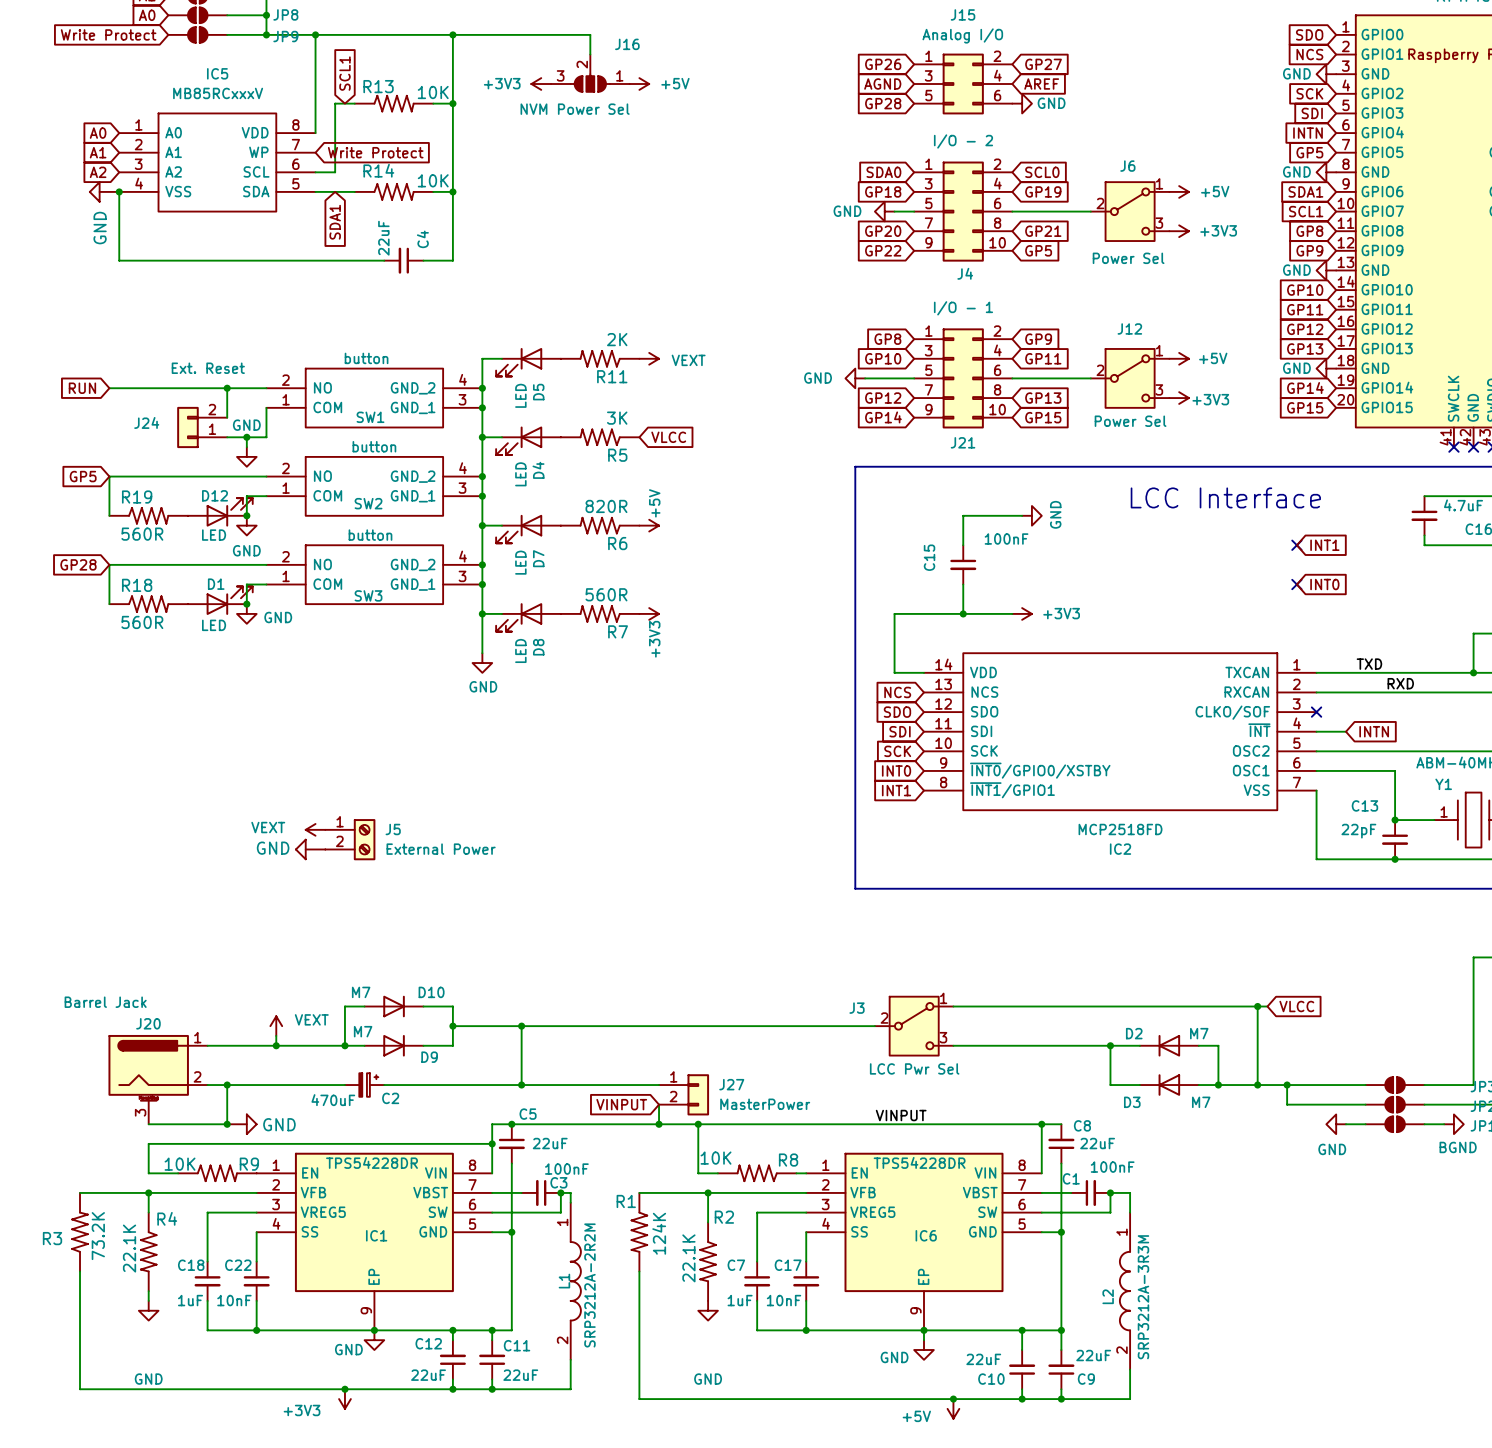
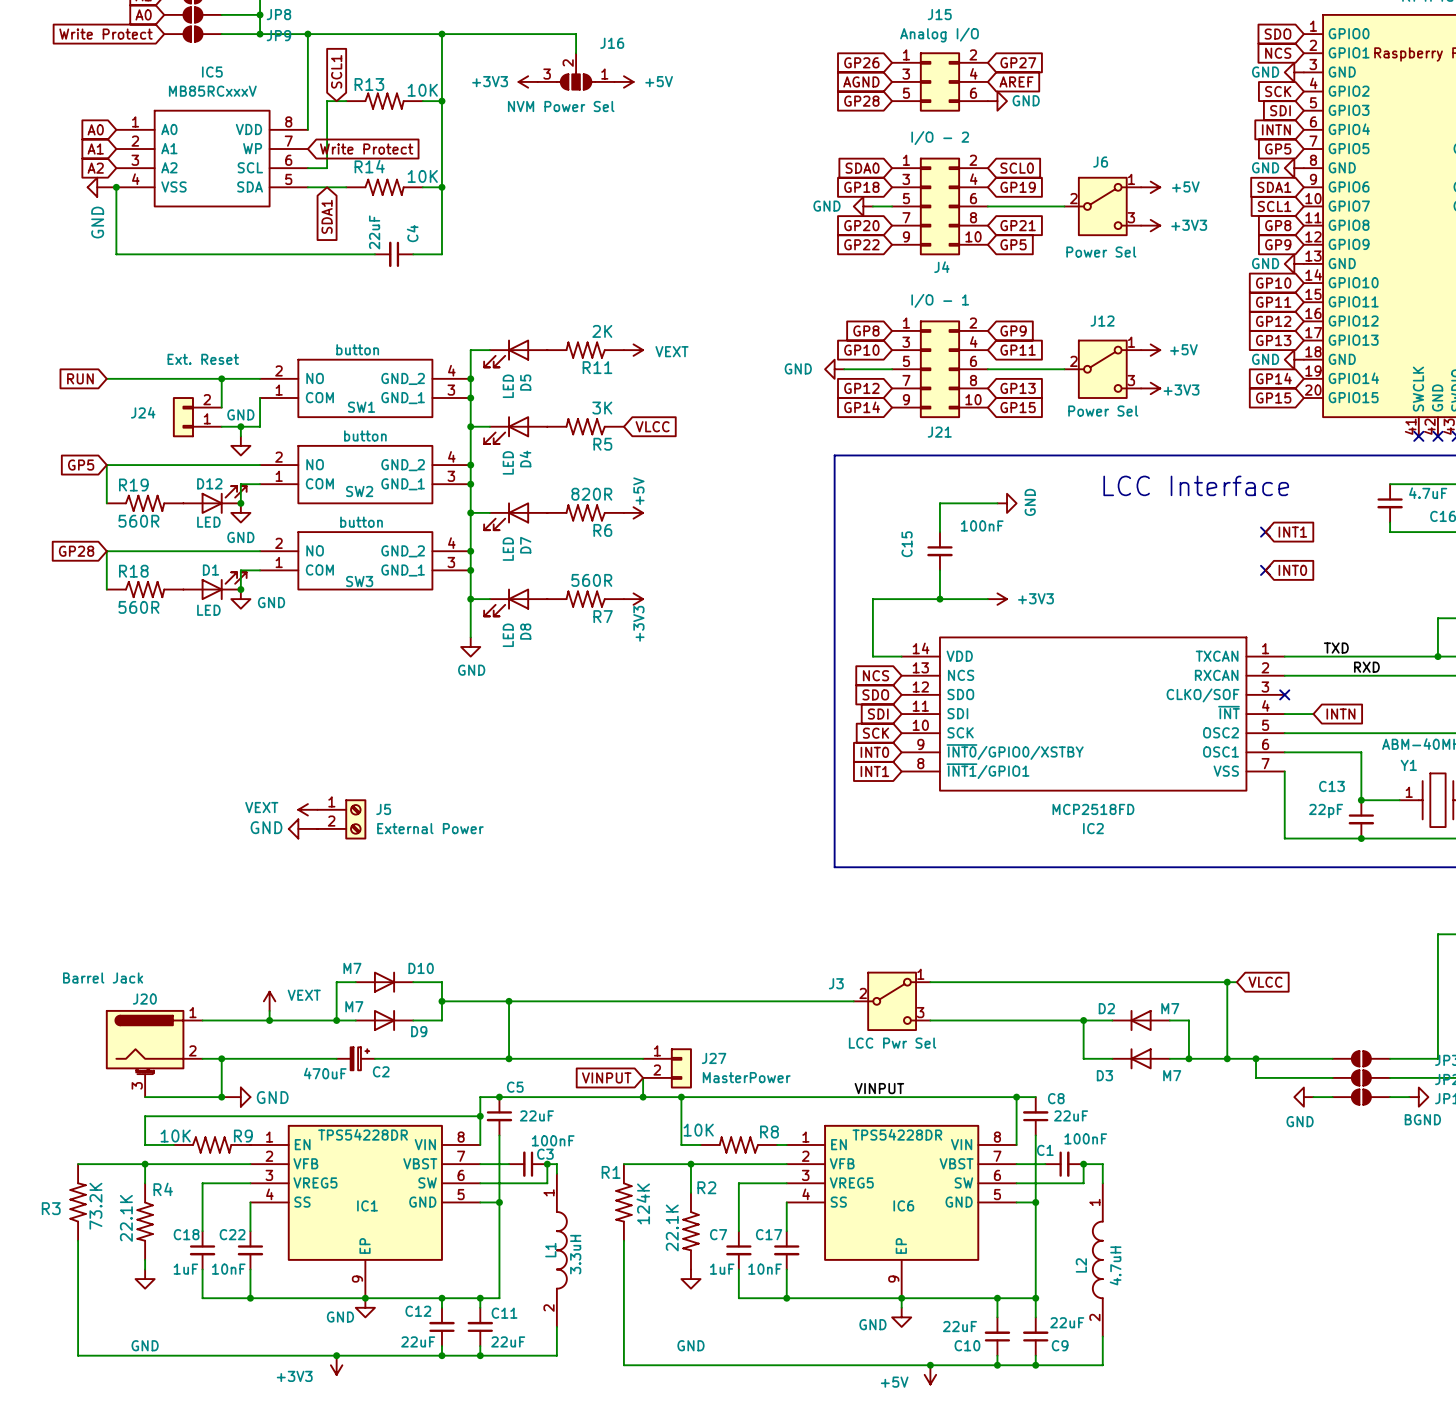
L1 value: SRP3212A-2R2M (589, 1285) -> 3.3uH (575, 1254)
L2 value: SRP3212A-3R3M (1143, 1297) -> 4.7uH (1115, 1265)

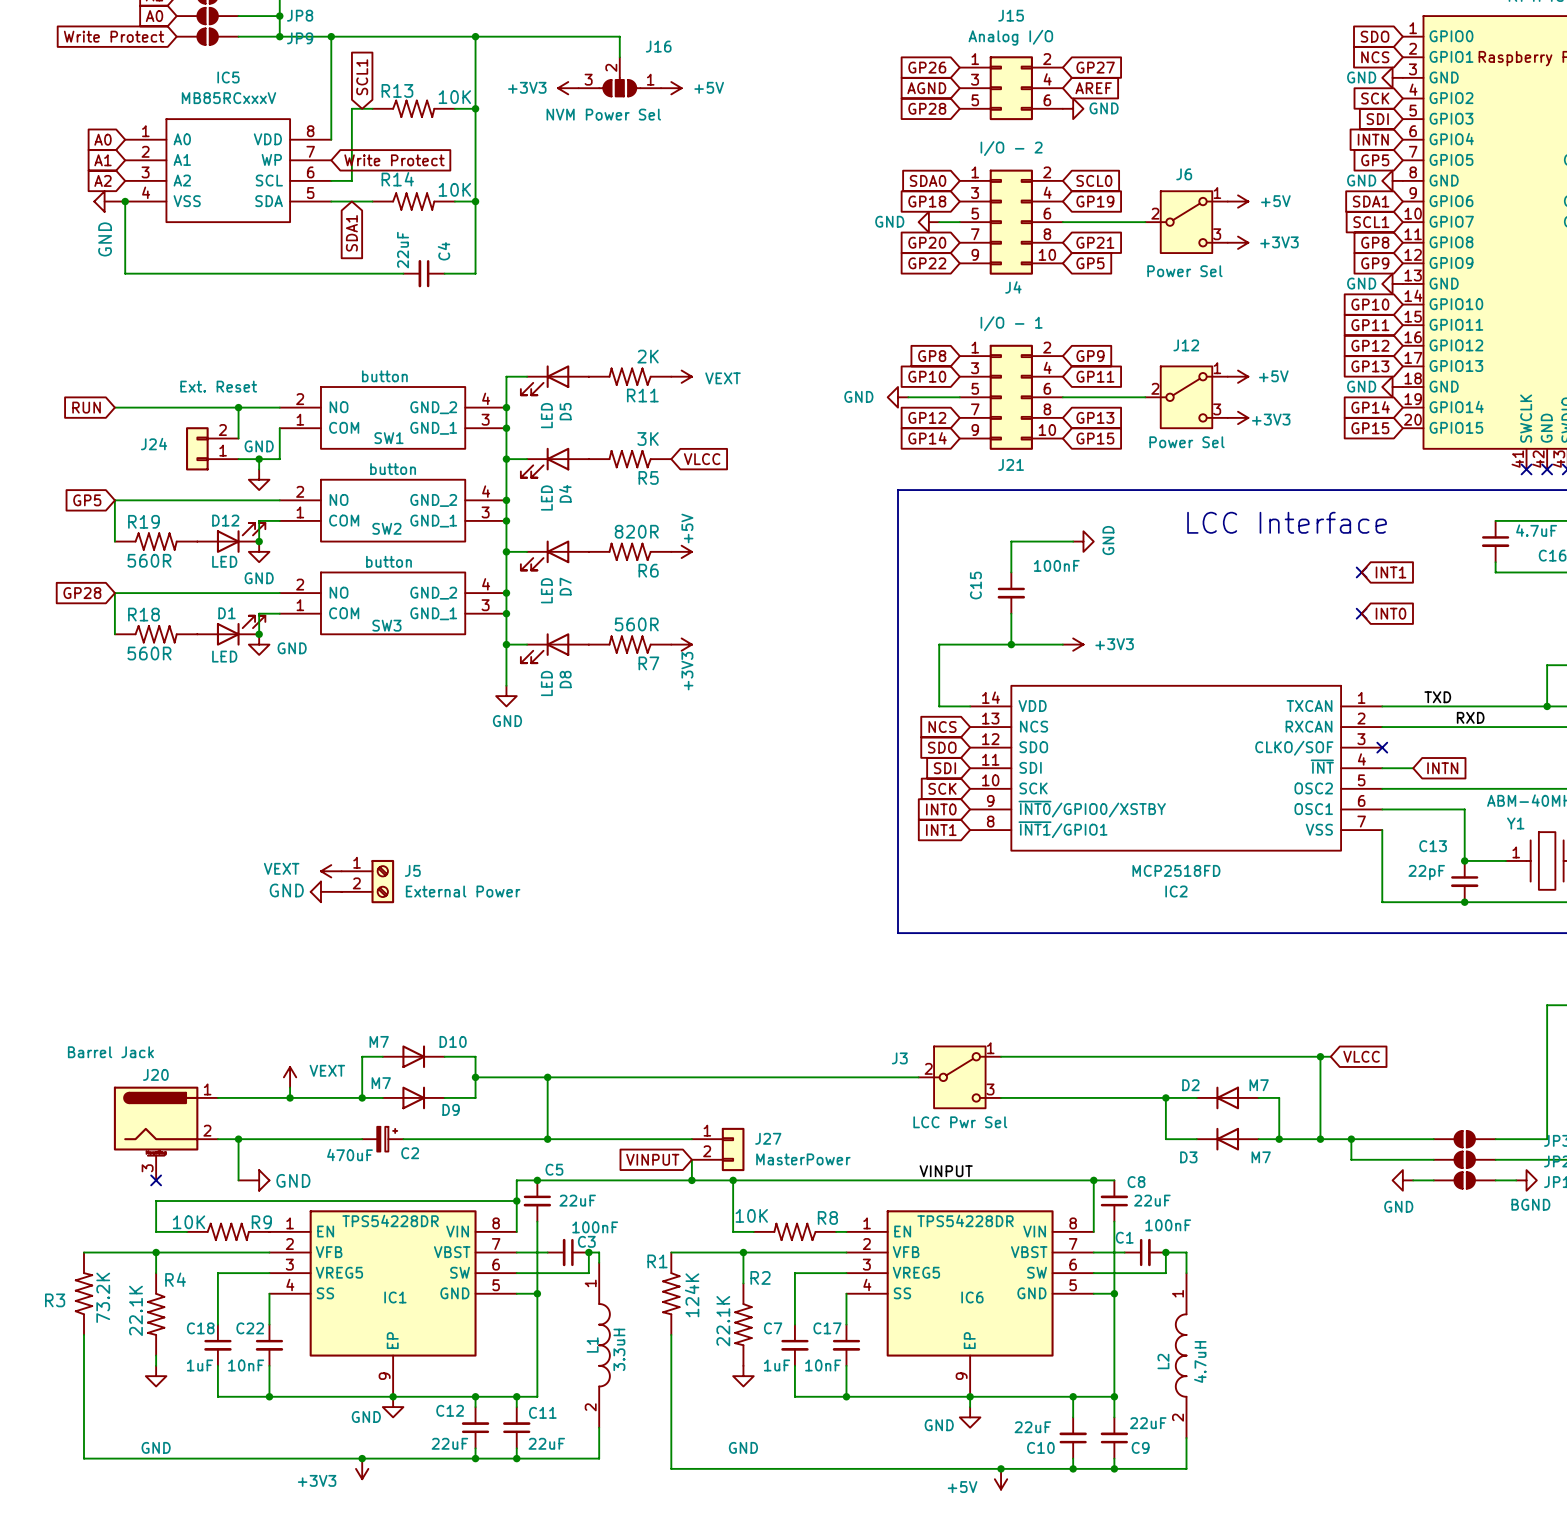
wire: (145, 1097) (221, 1097) -> none
no-connect mark: none -> (156, 1180)
junction: (221, 1097) -> none

